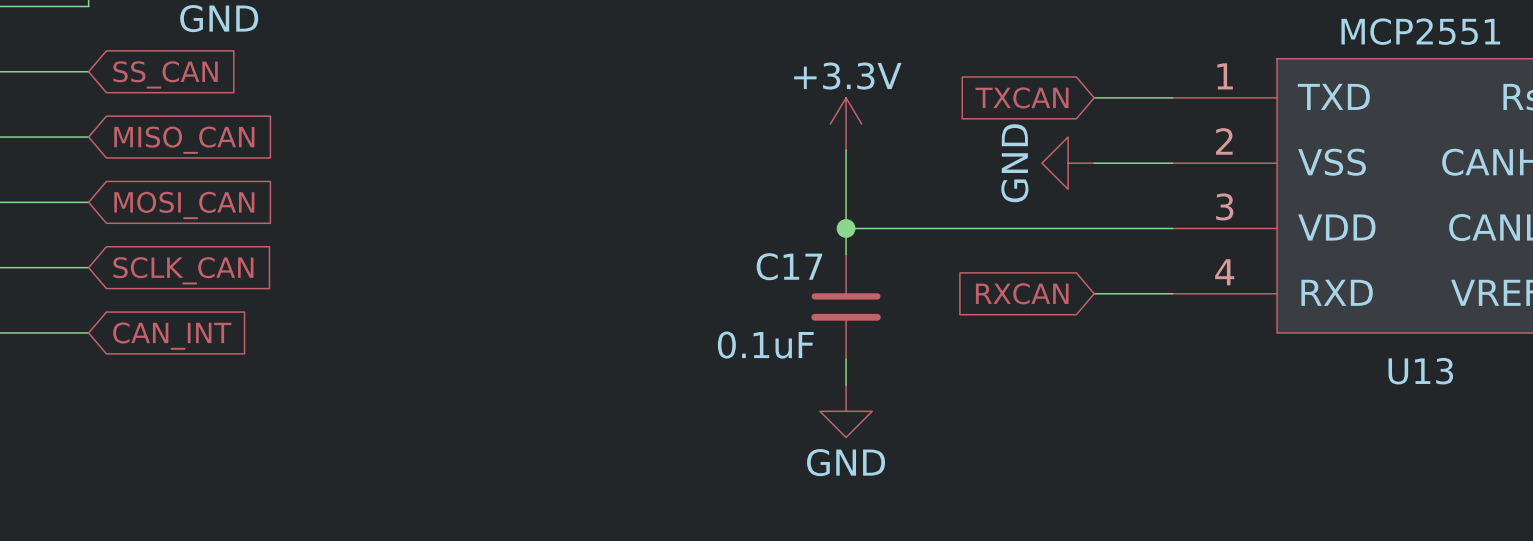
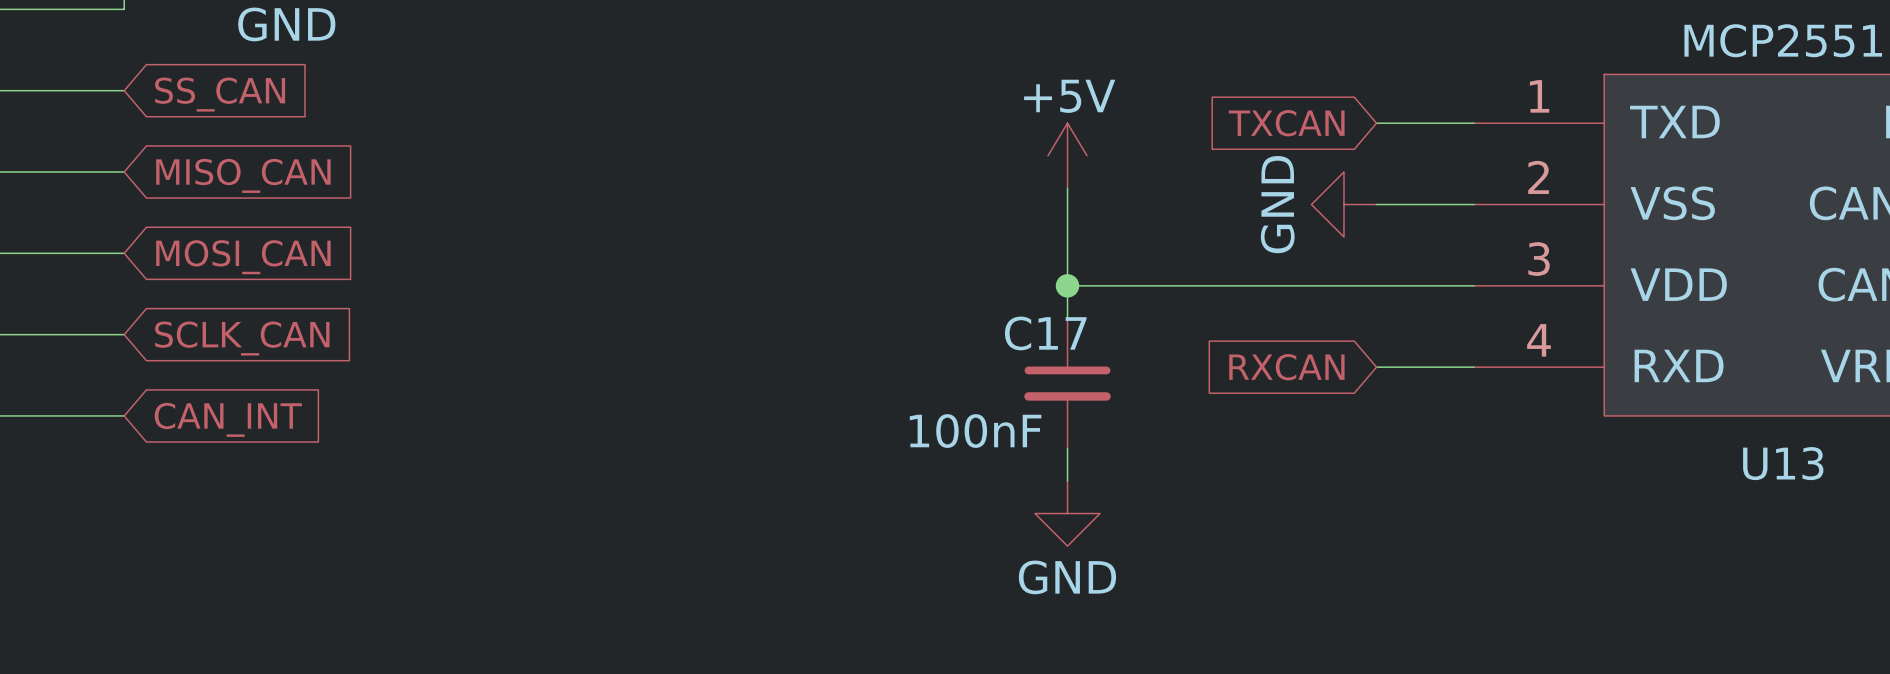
power symbol: +3.3V (846, 124) -> +5V (1067, 155)
C17 name position: C17 (789, 266) -> C17 (1045, 333)
C17 value: 0.1uF (765, 345) -> 100nF (975, 431)

